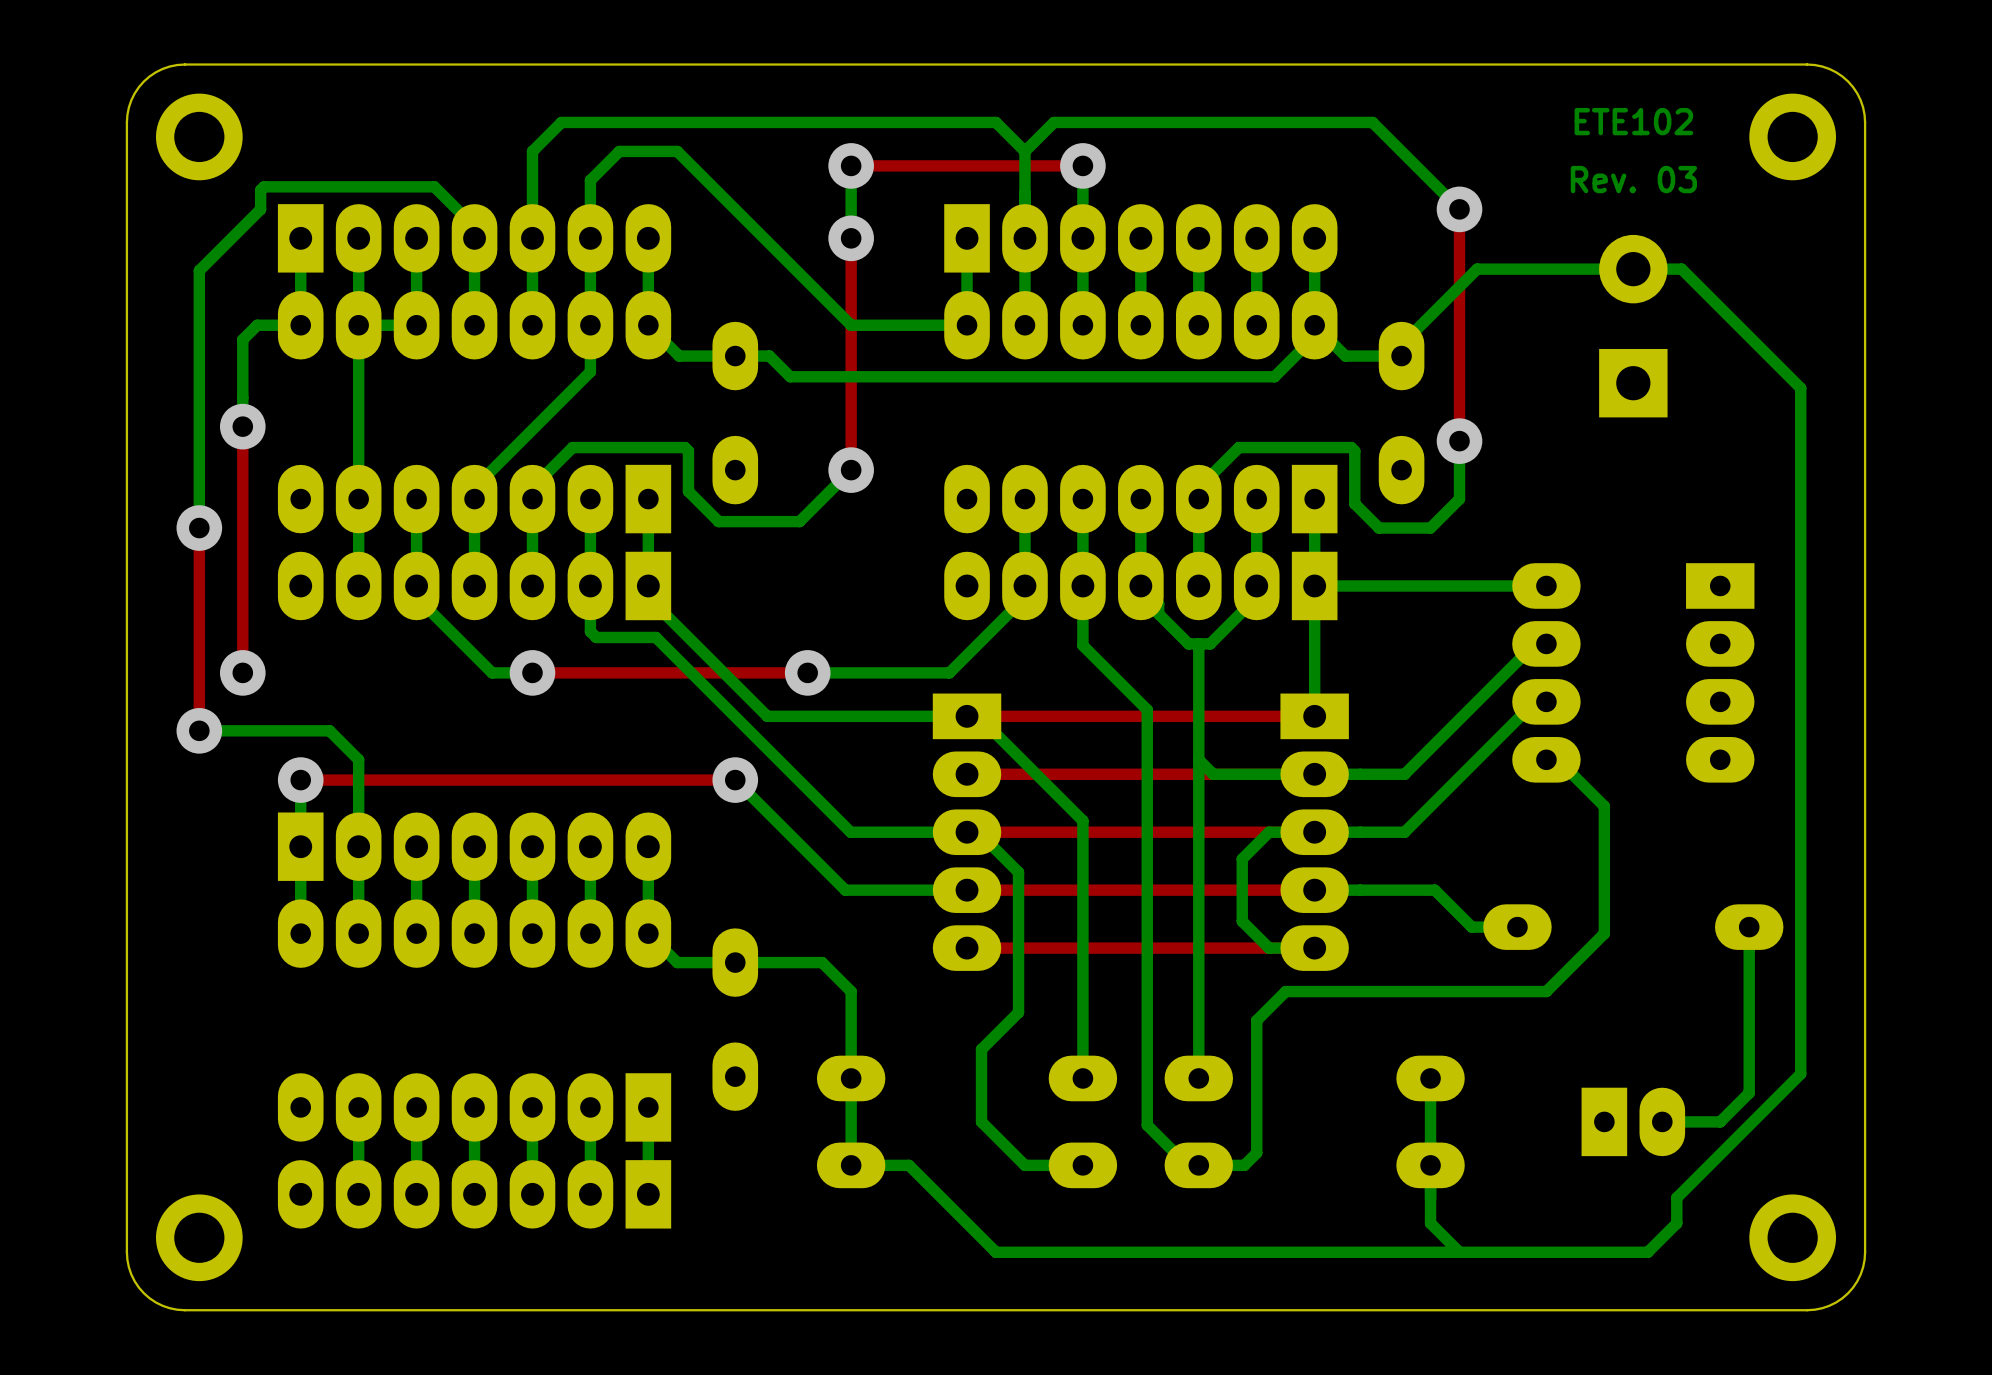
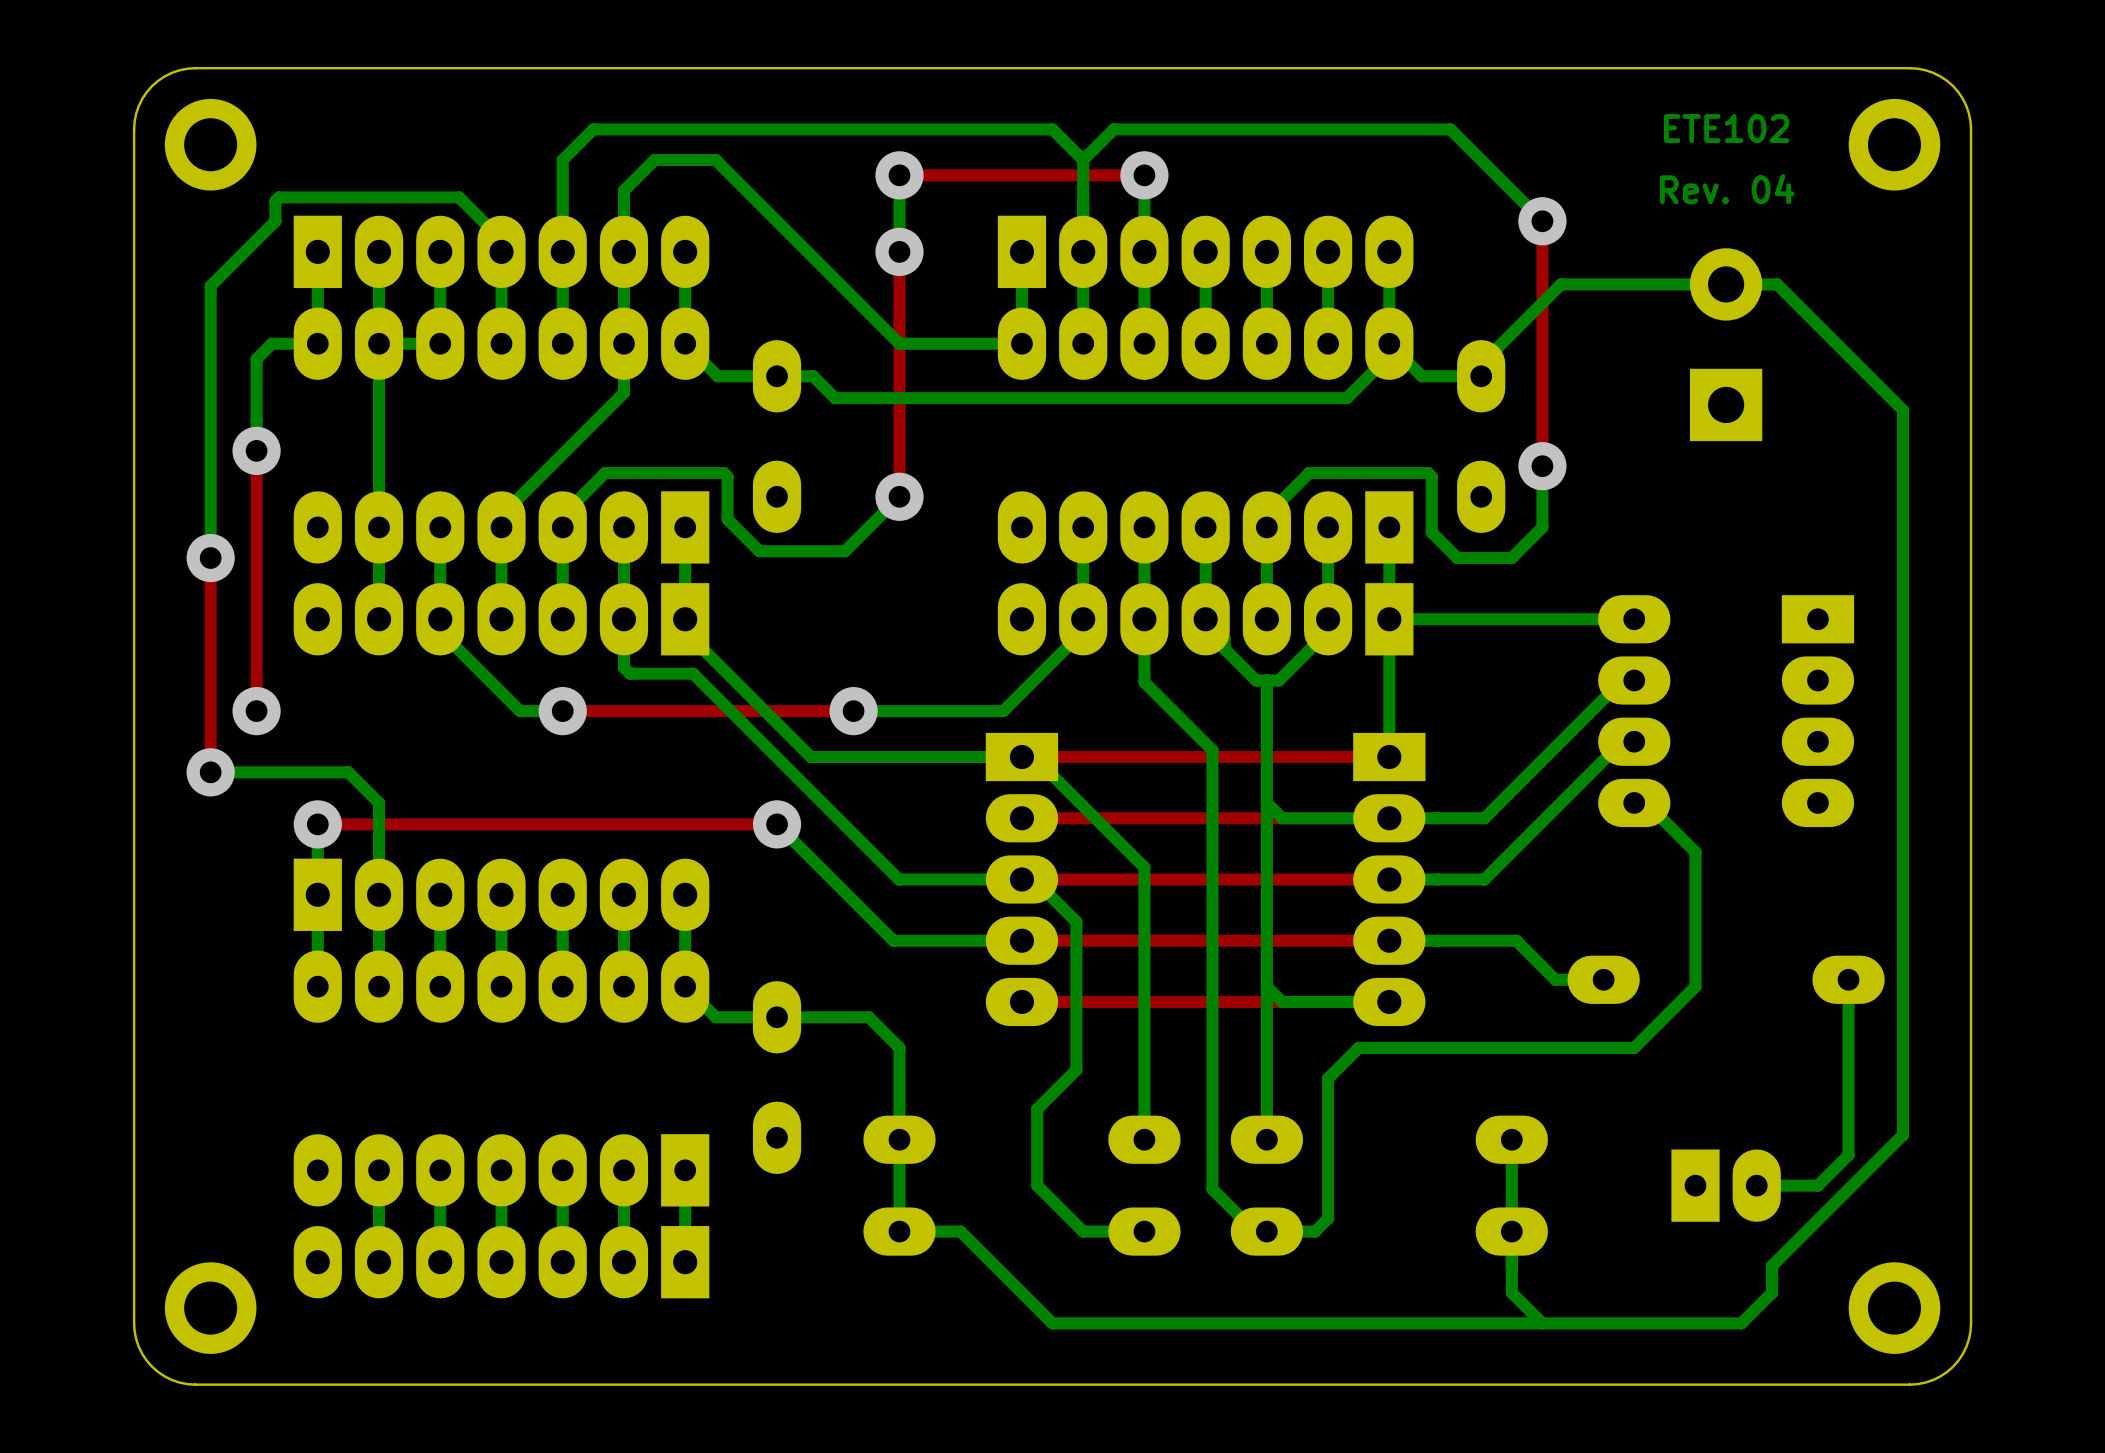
text: Rev. 03 (1633, 179) -> Rev. 04 (1727, 189)
bottom track: (1314, 832) (1269, 832) (1242, 859) (1242, 921) (1269, 948) -> (1266, 986) (1282, 1001) (1341, 1001)

